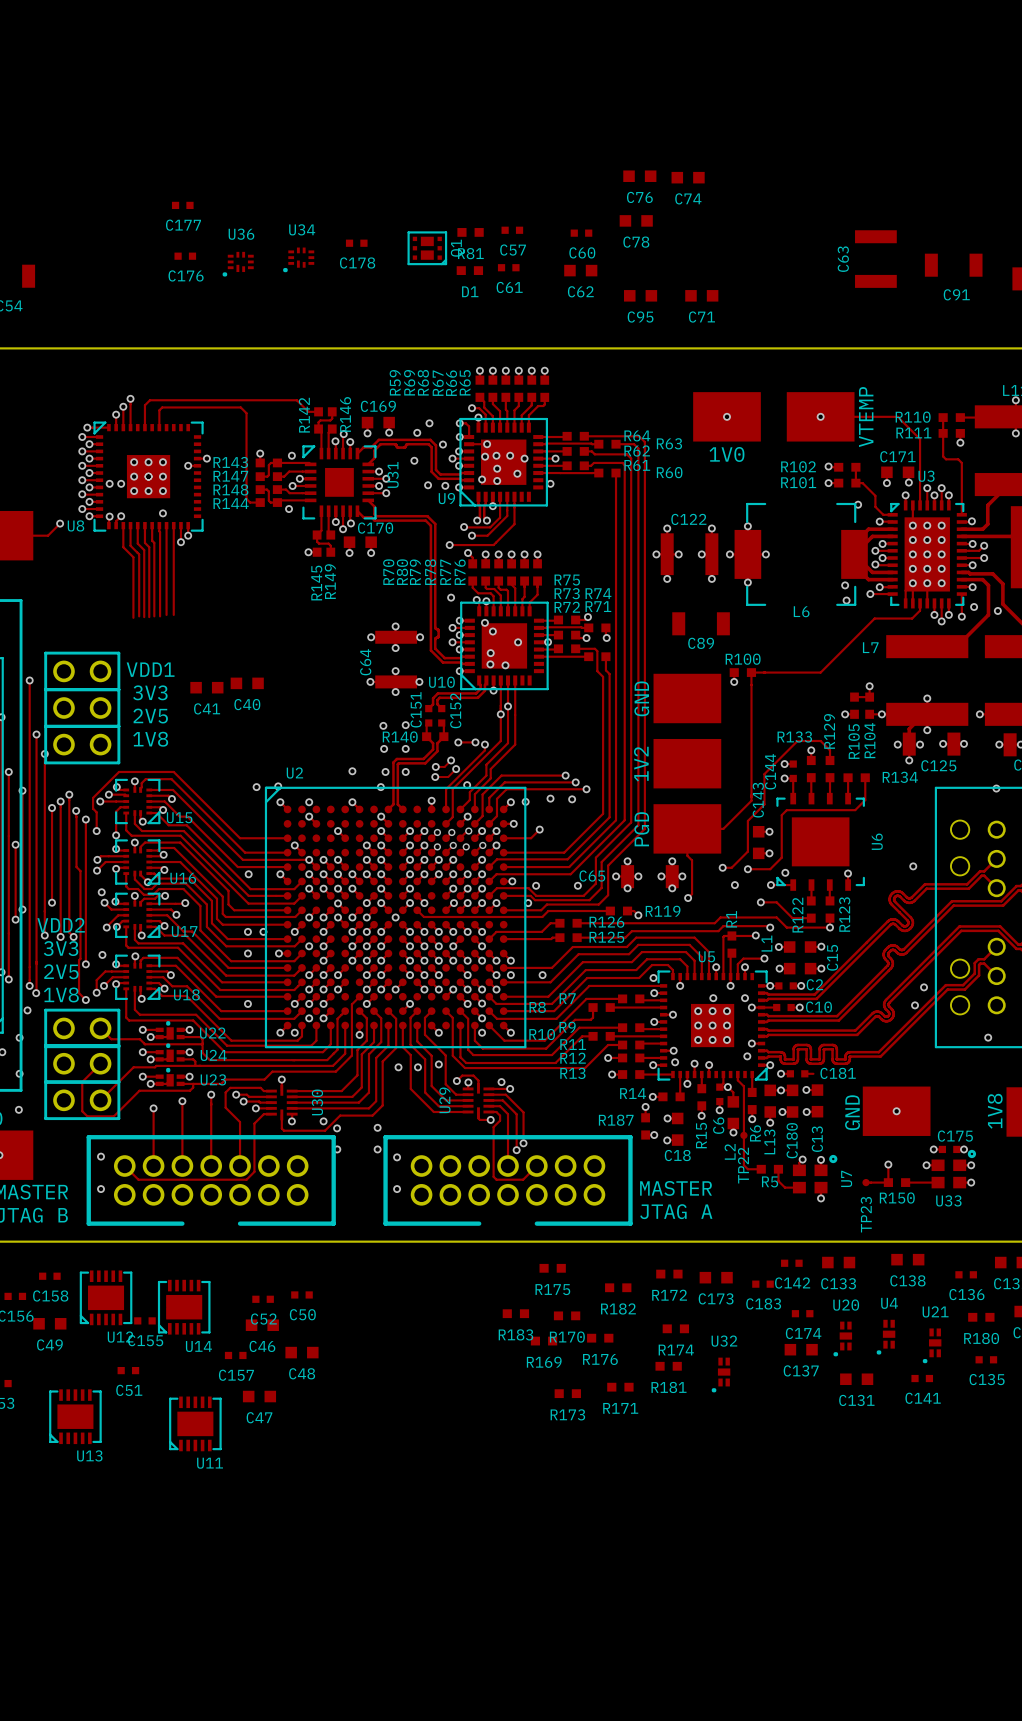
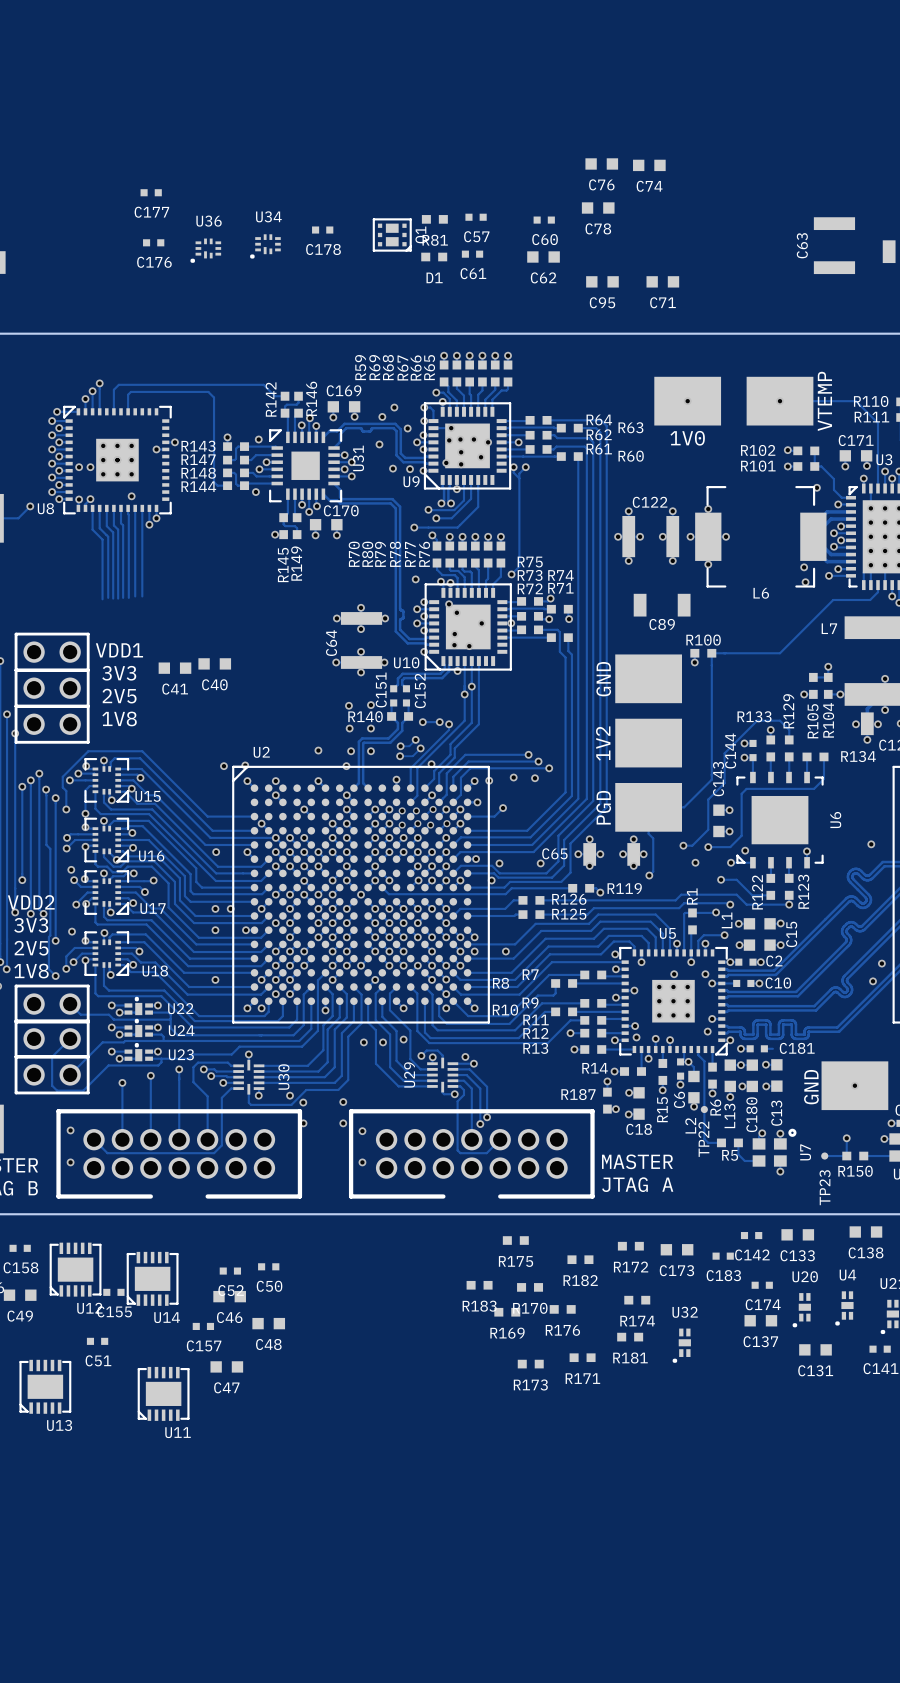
track: none -> (513, 467) (513, 472) (519, 478)
track: none -> (525, 467) (519, 473) (519, 566) (511, 574)
via: none -> (525, 467)
via: none -> (511, 574)

